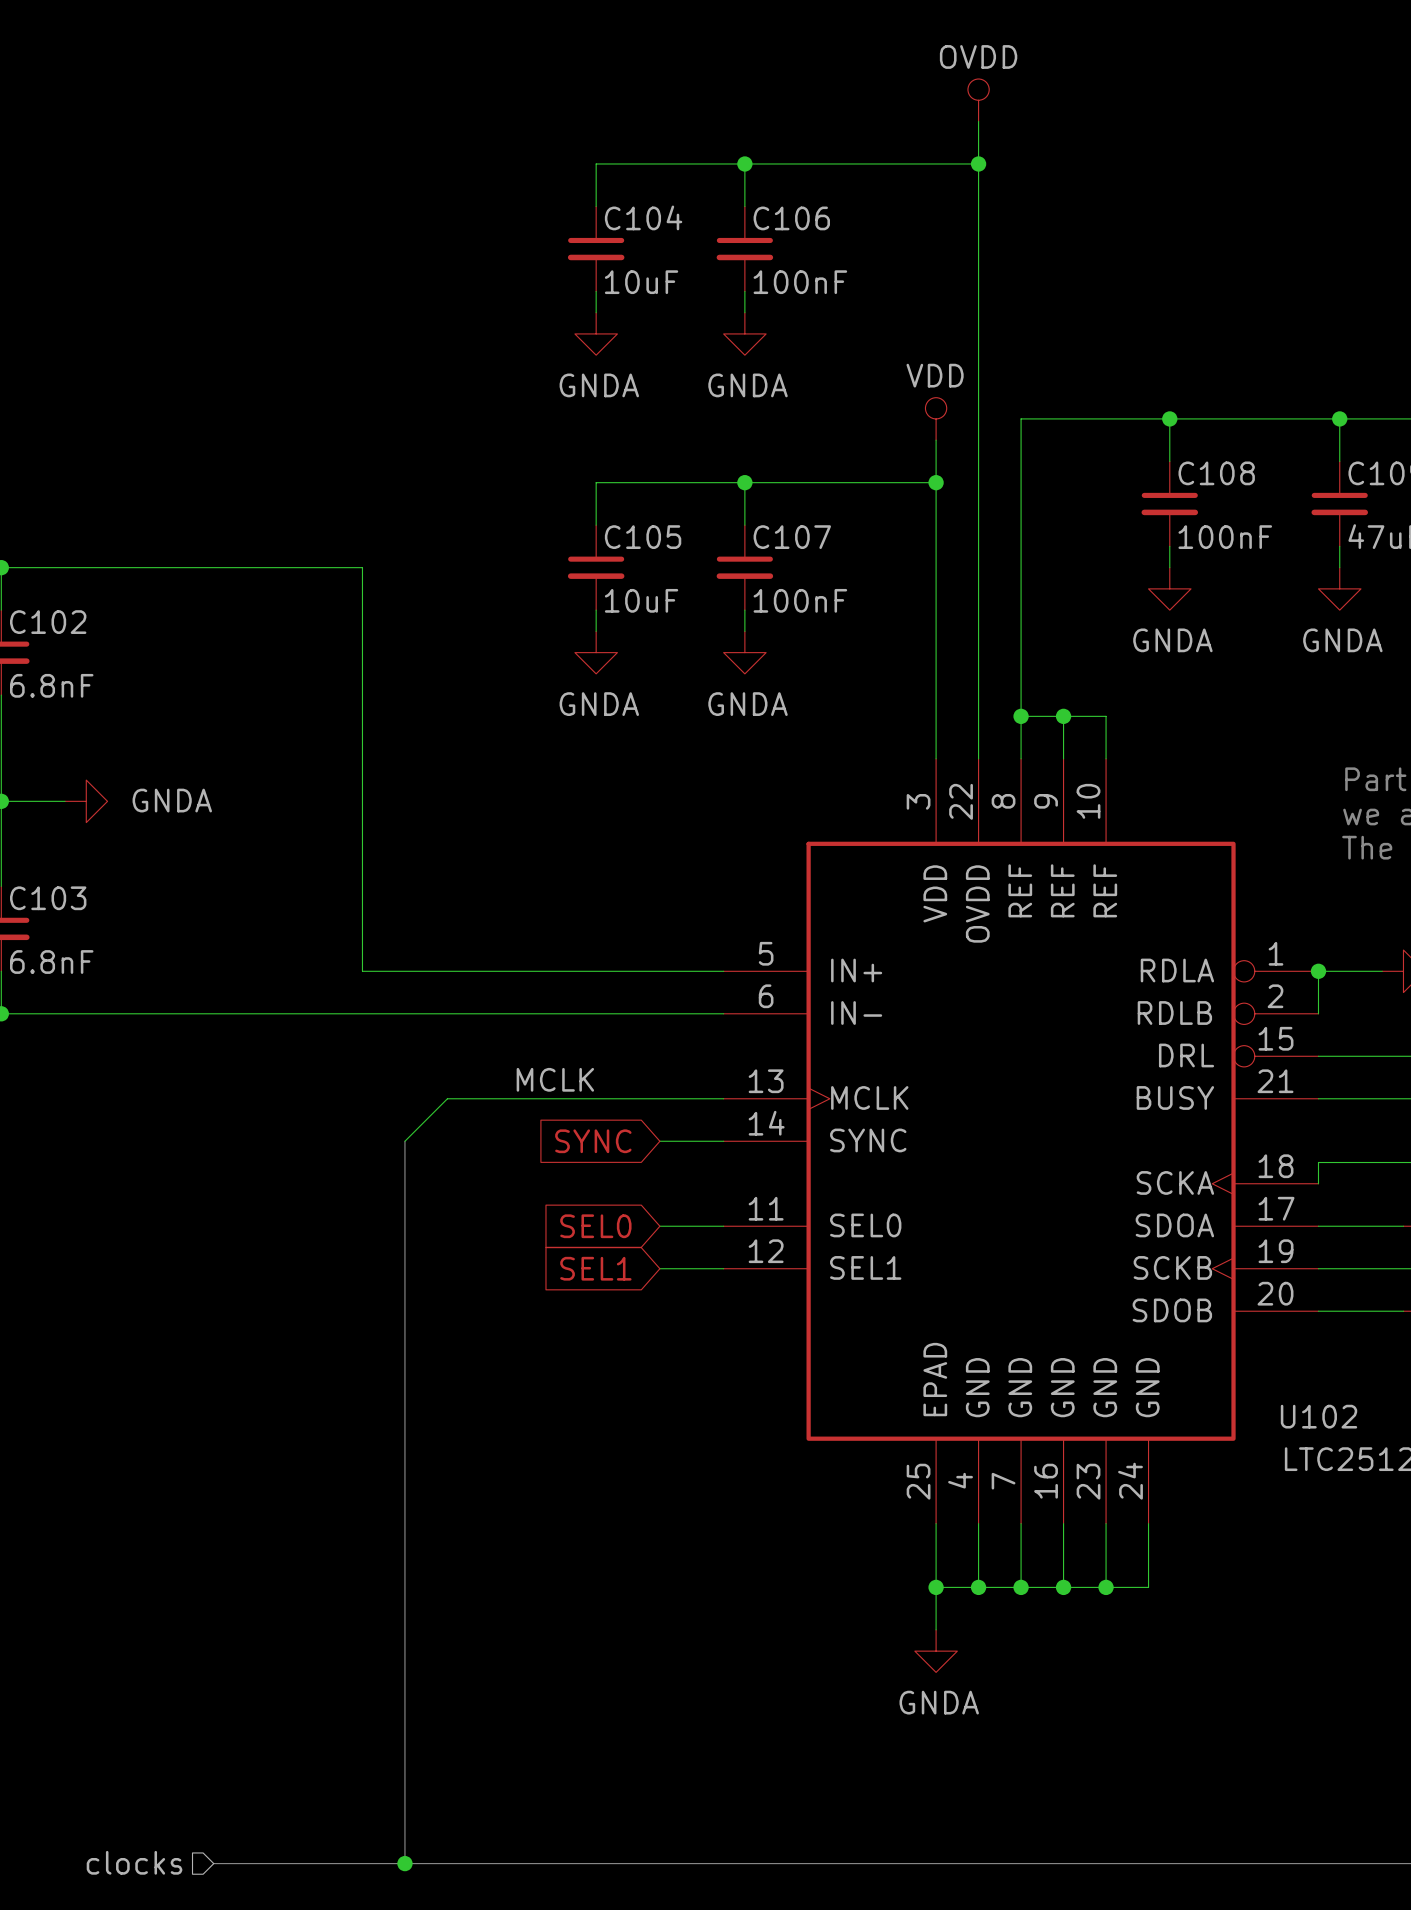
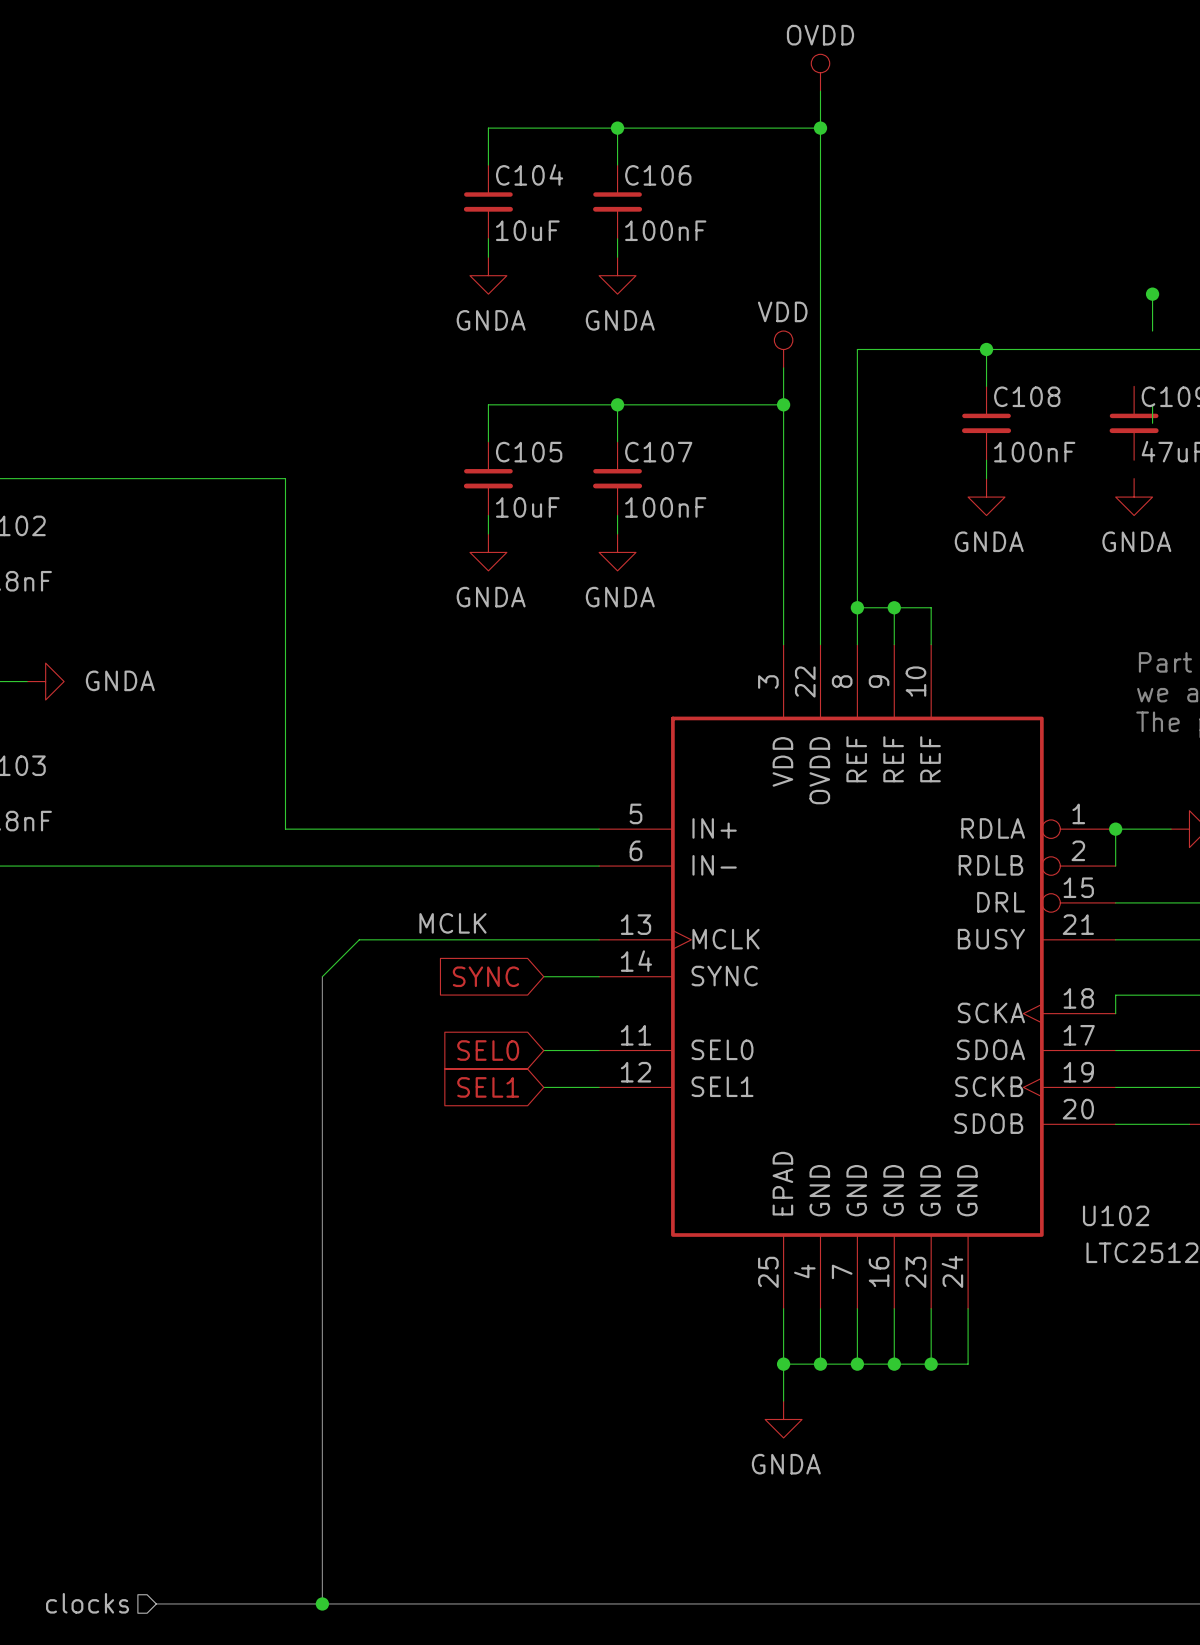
wire: (1339, 418) (1339, 461) -> (1152, 294) (1152, 331)
junction position: (1339, 418) -> (1152, 294)
wire: (1339, 546) (1339, 567) -> (1152, 404) (1152, 423)

